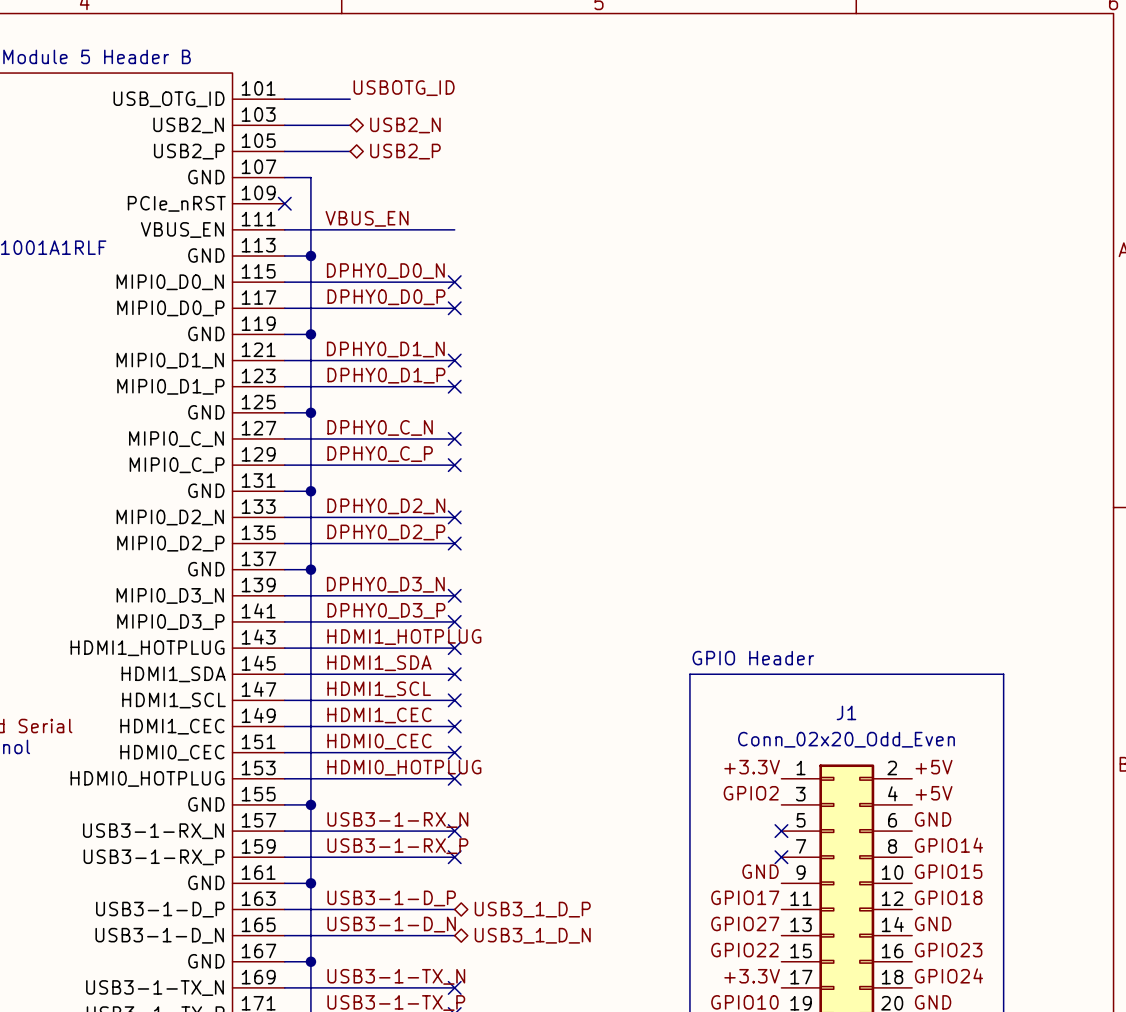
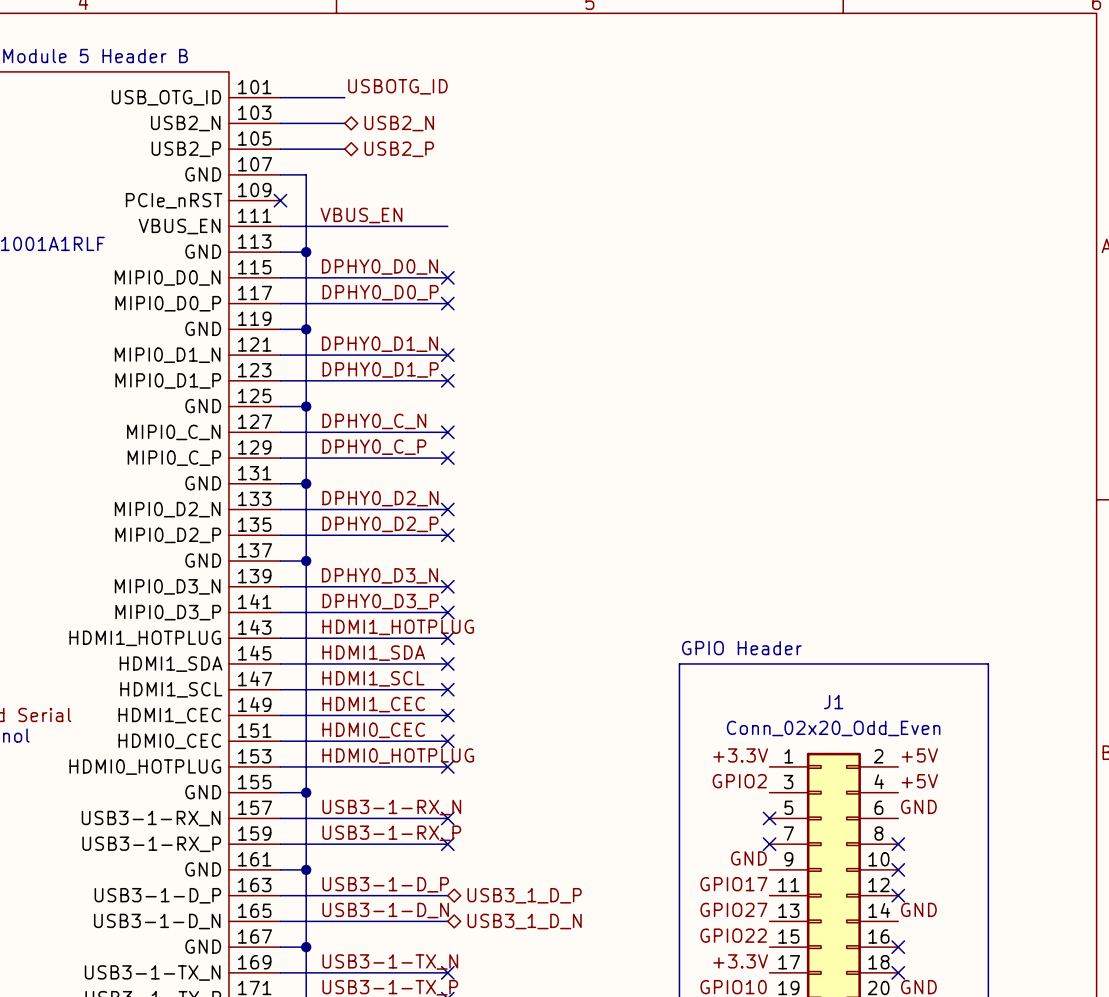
label: GPIO14 (948, 845) -> none
no-connect mark: none -> (898, 844)
label: GPIO15 (948, 871) -> none
no-connect mark: none -> (898, 869)
label: GPIO18 (948, 897) -> none
no-connect mark: none -> (898, 895)
label: GPIO23 (948, 950) -> none
no-connect mark: none -> (898, 947)
label: GPIO24 (948, 975) -> none
no-connect mark: none -> (898, 972)

